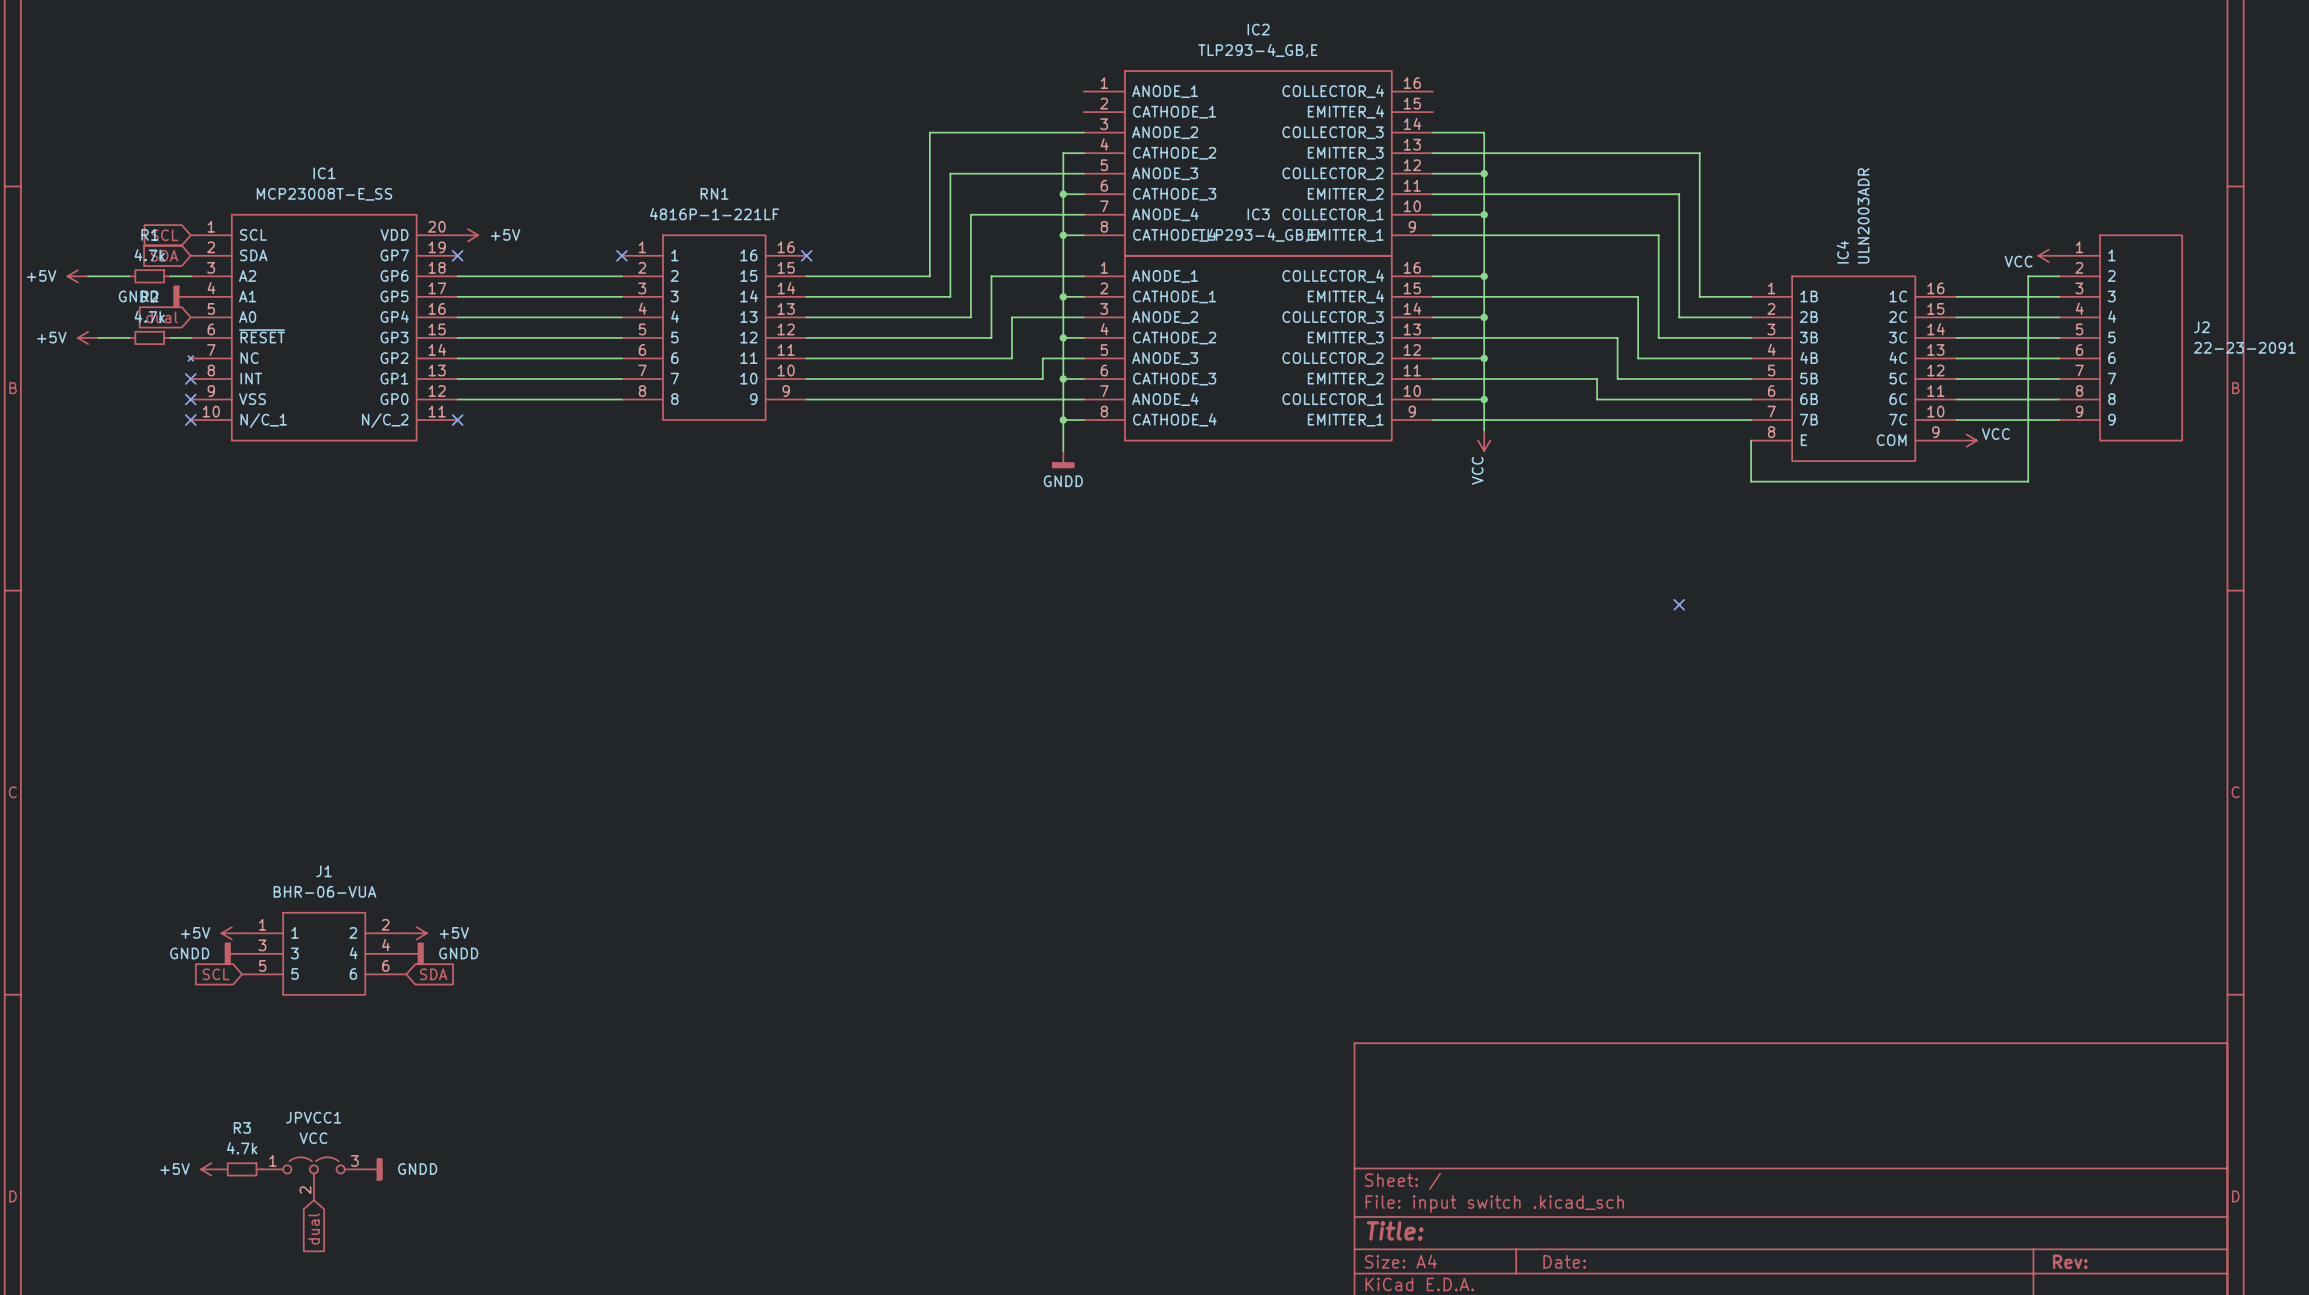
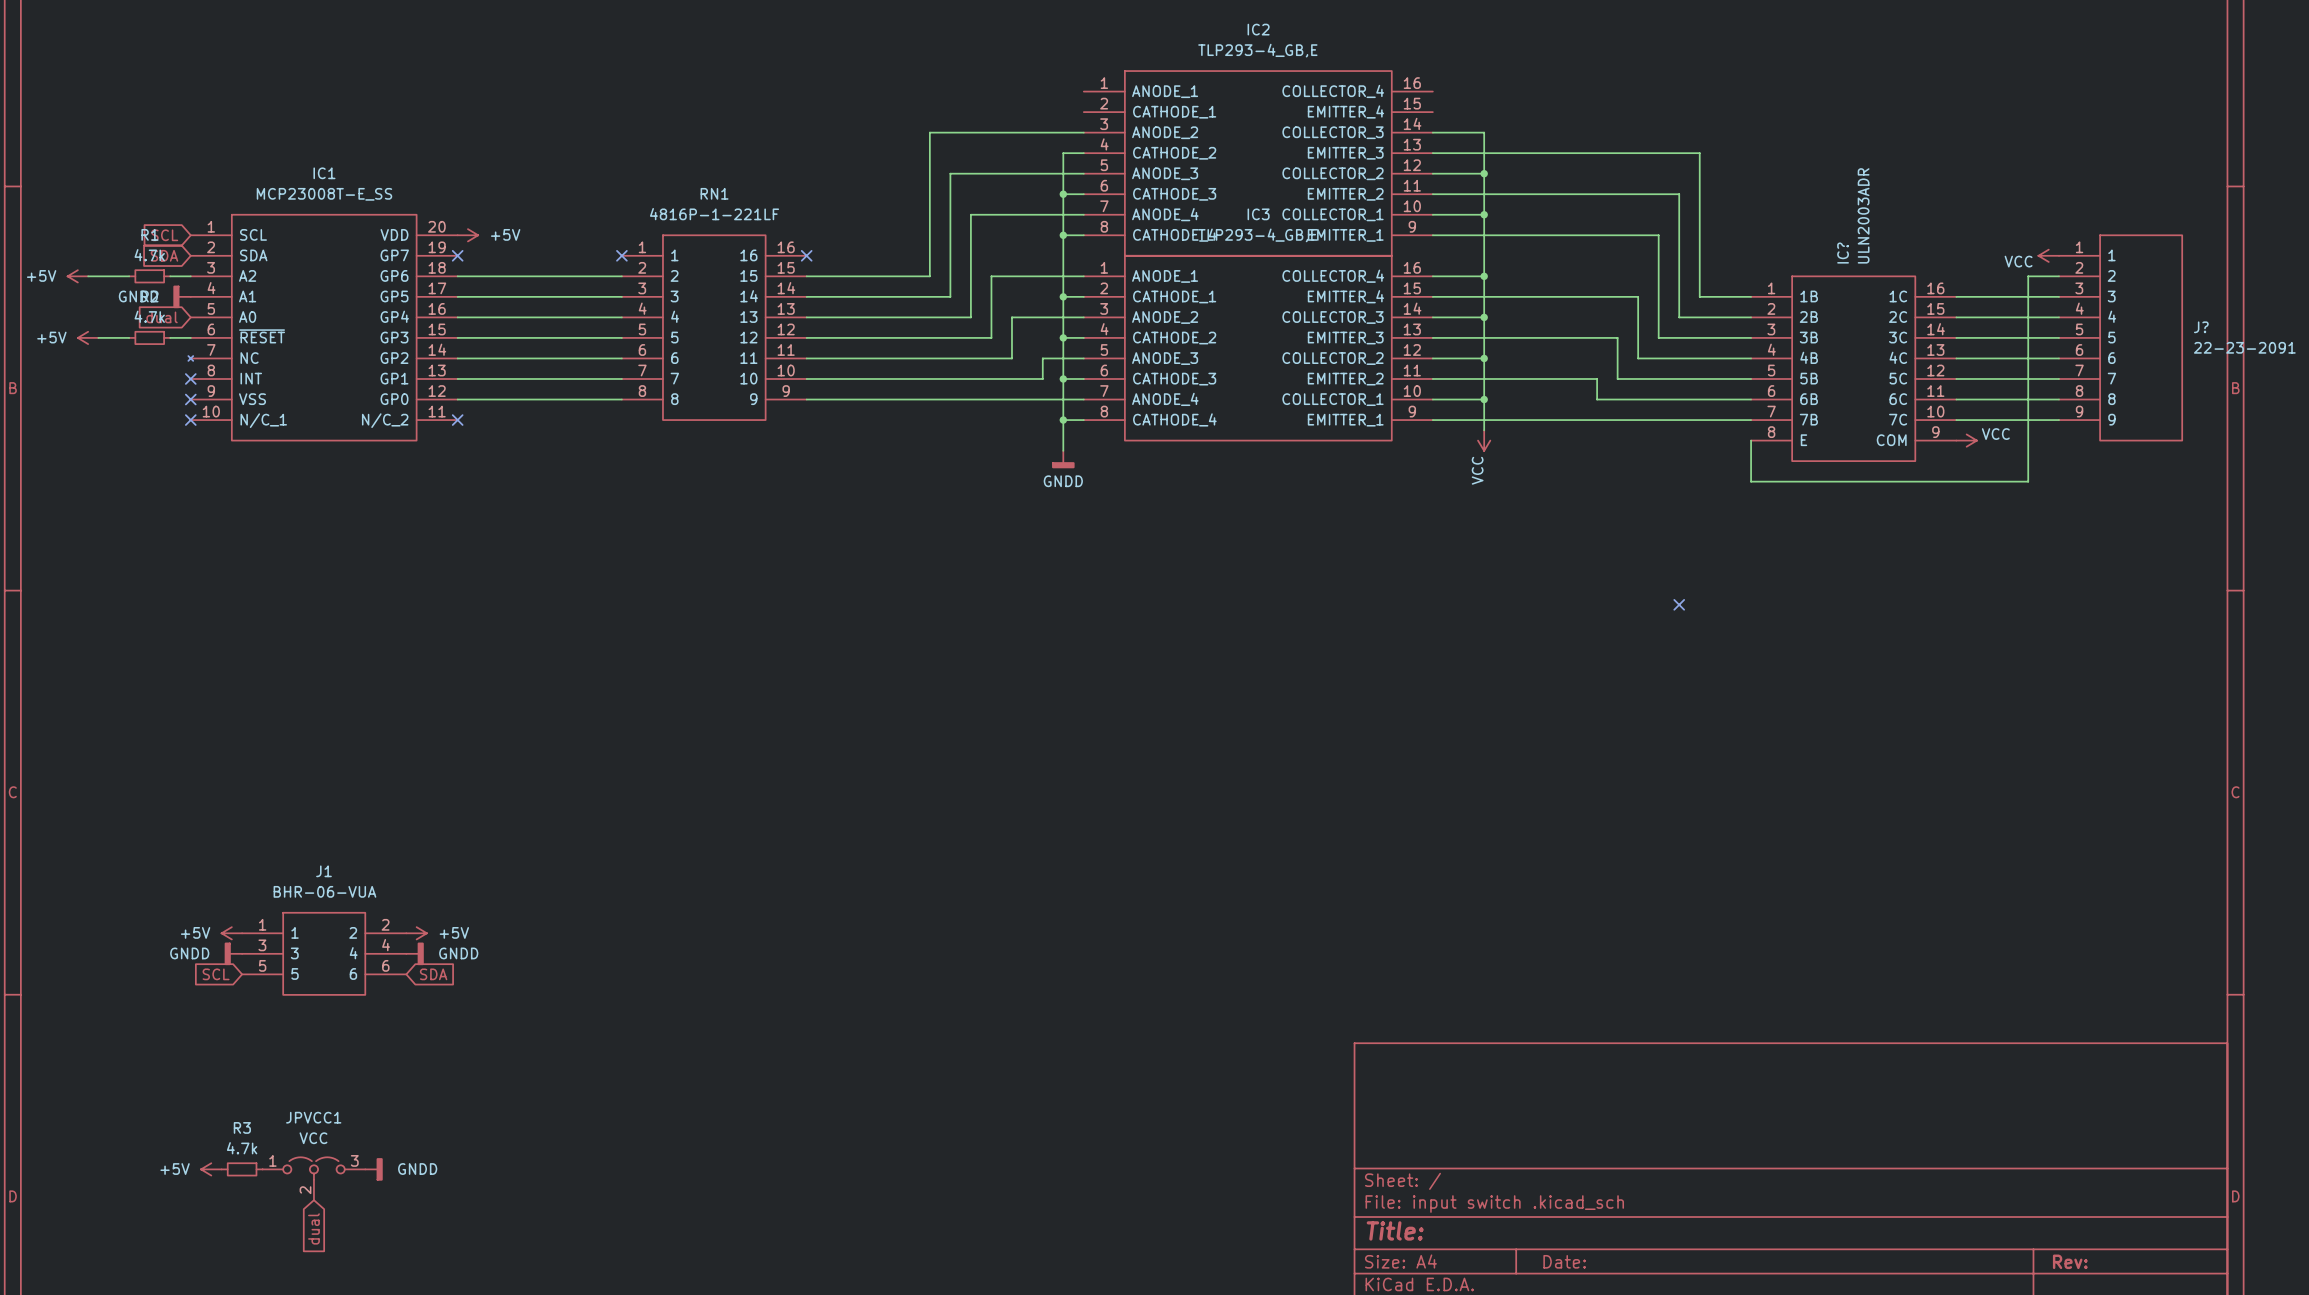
IC4 name: IC4 (1842, 252) -> IC? (1843, 253)
J2 name: J2 (2201, 327) -> J? (2201, 327)

